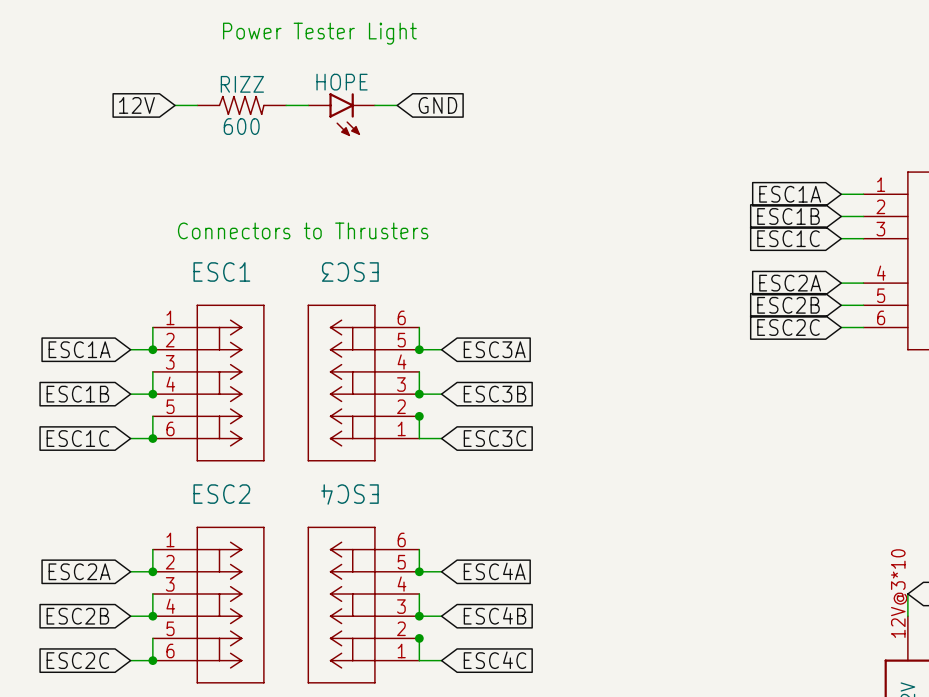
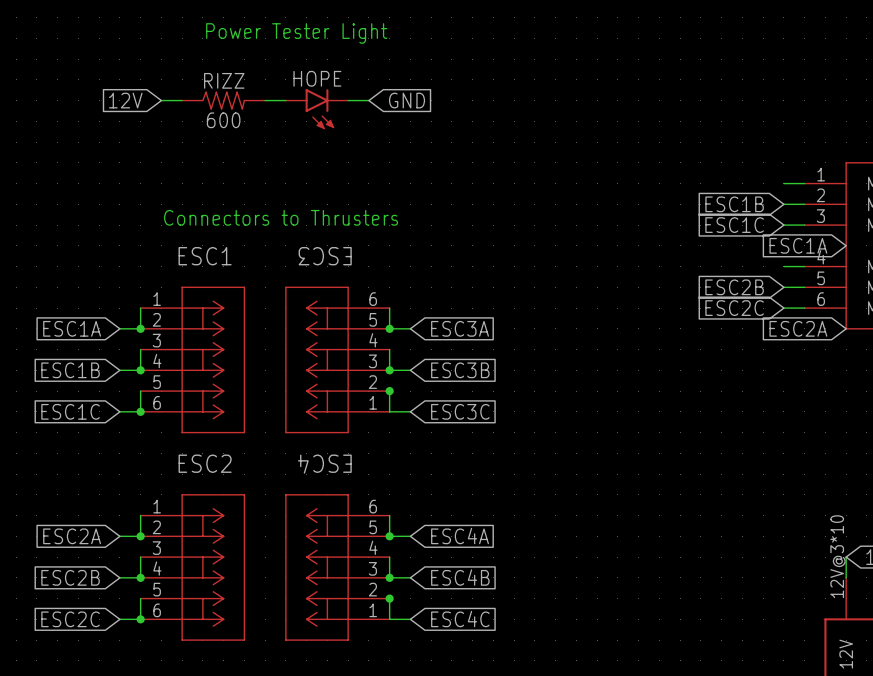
global label position: ESC1A (790, 194) -> ESC1A (798, 245)
global label position: ESC2A (790, 283) -> ESC2A (798, 328)

